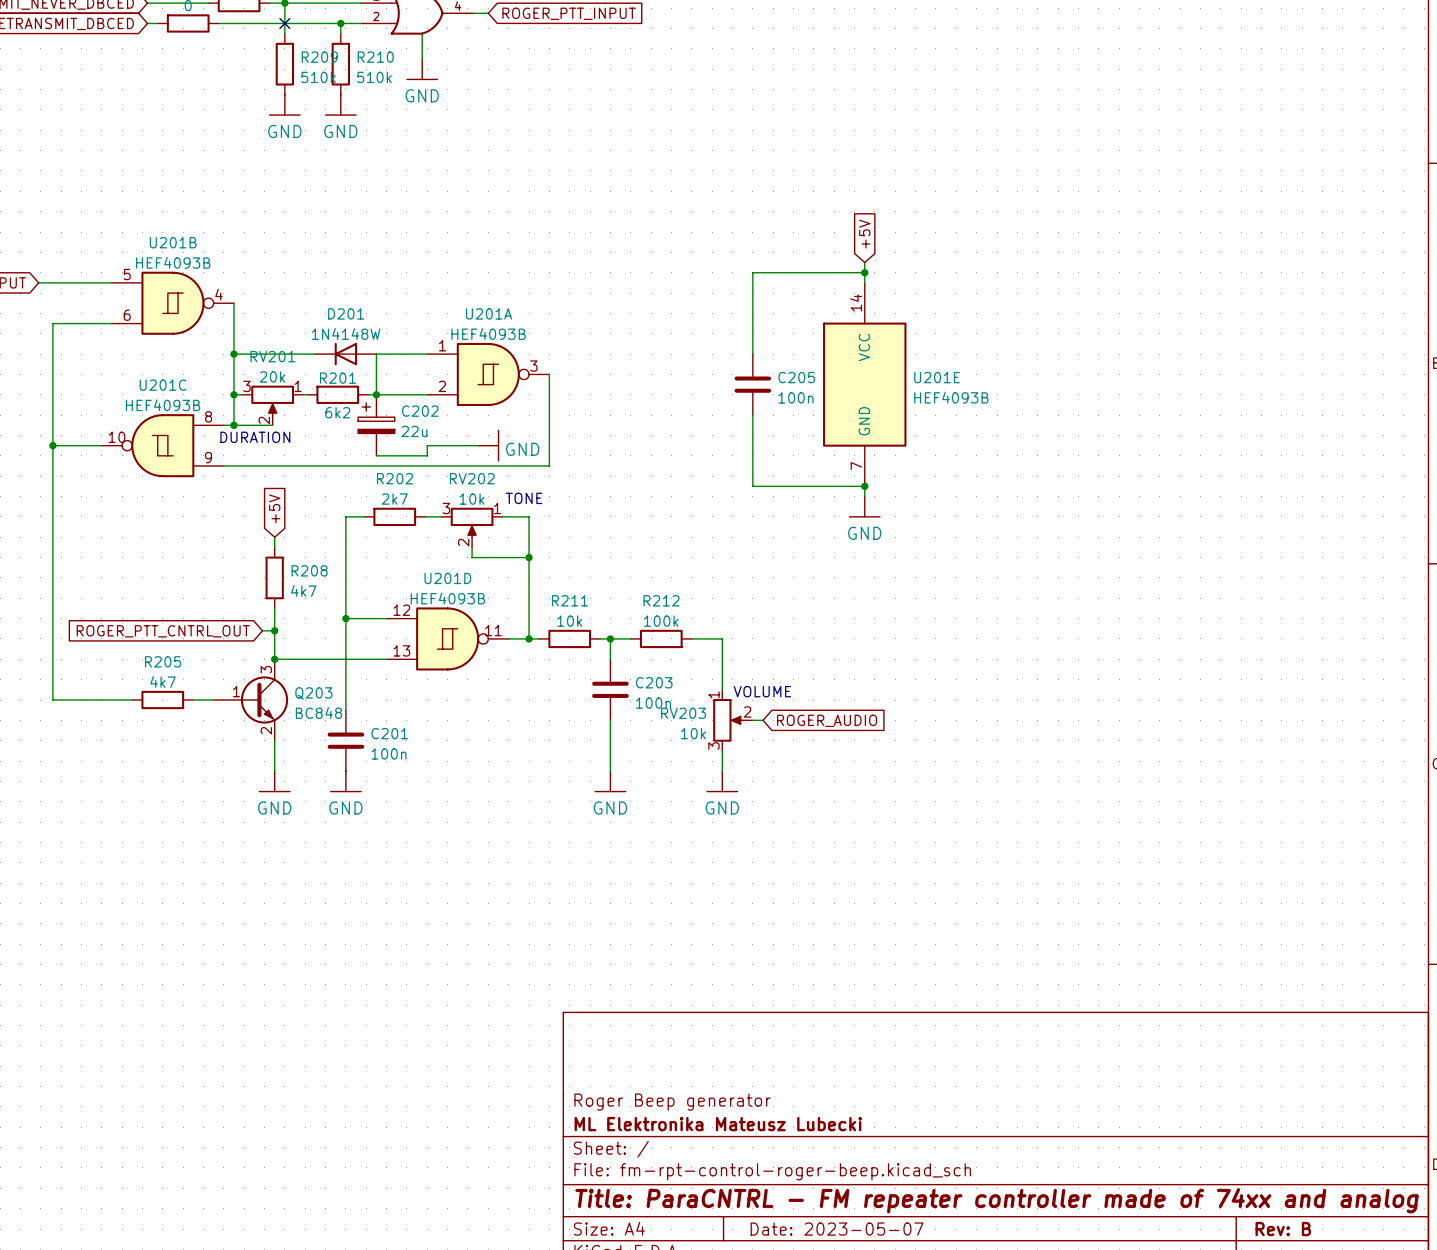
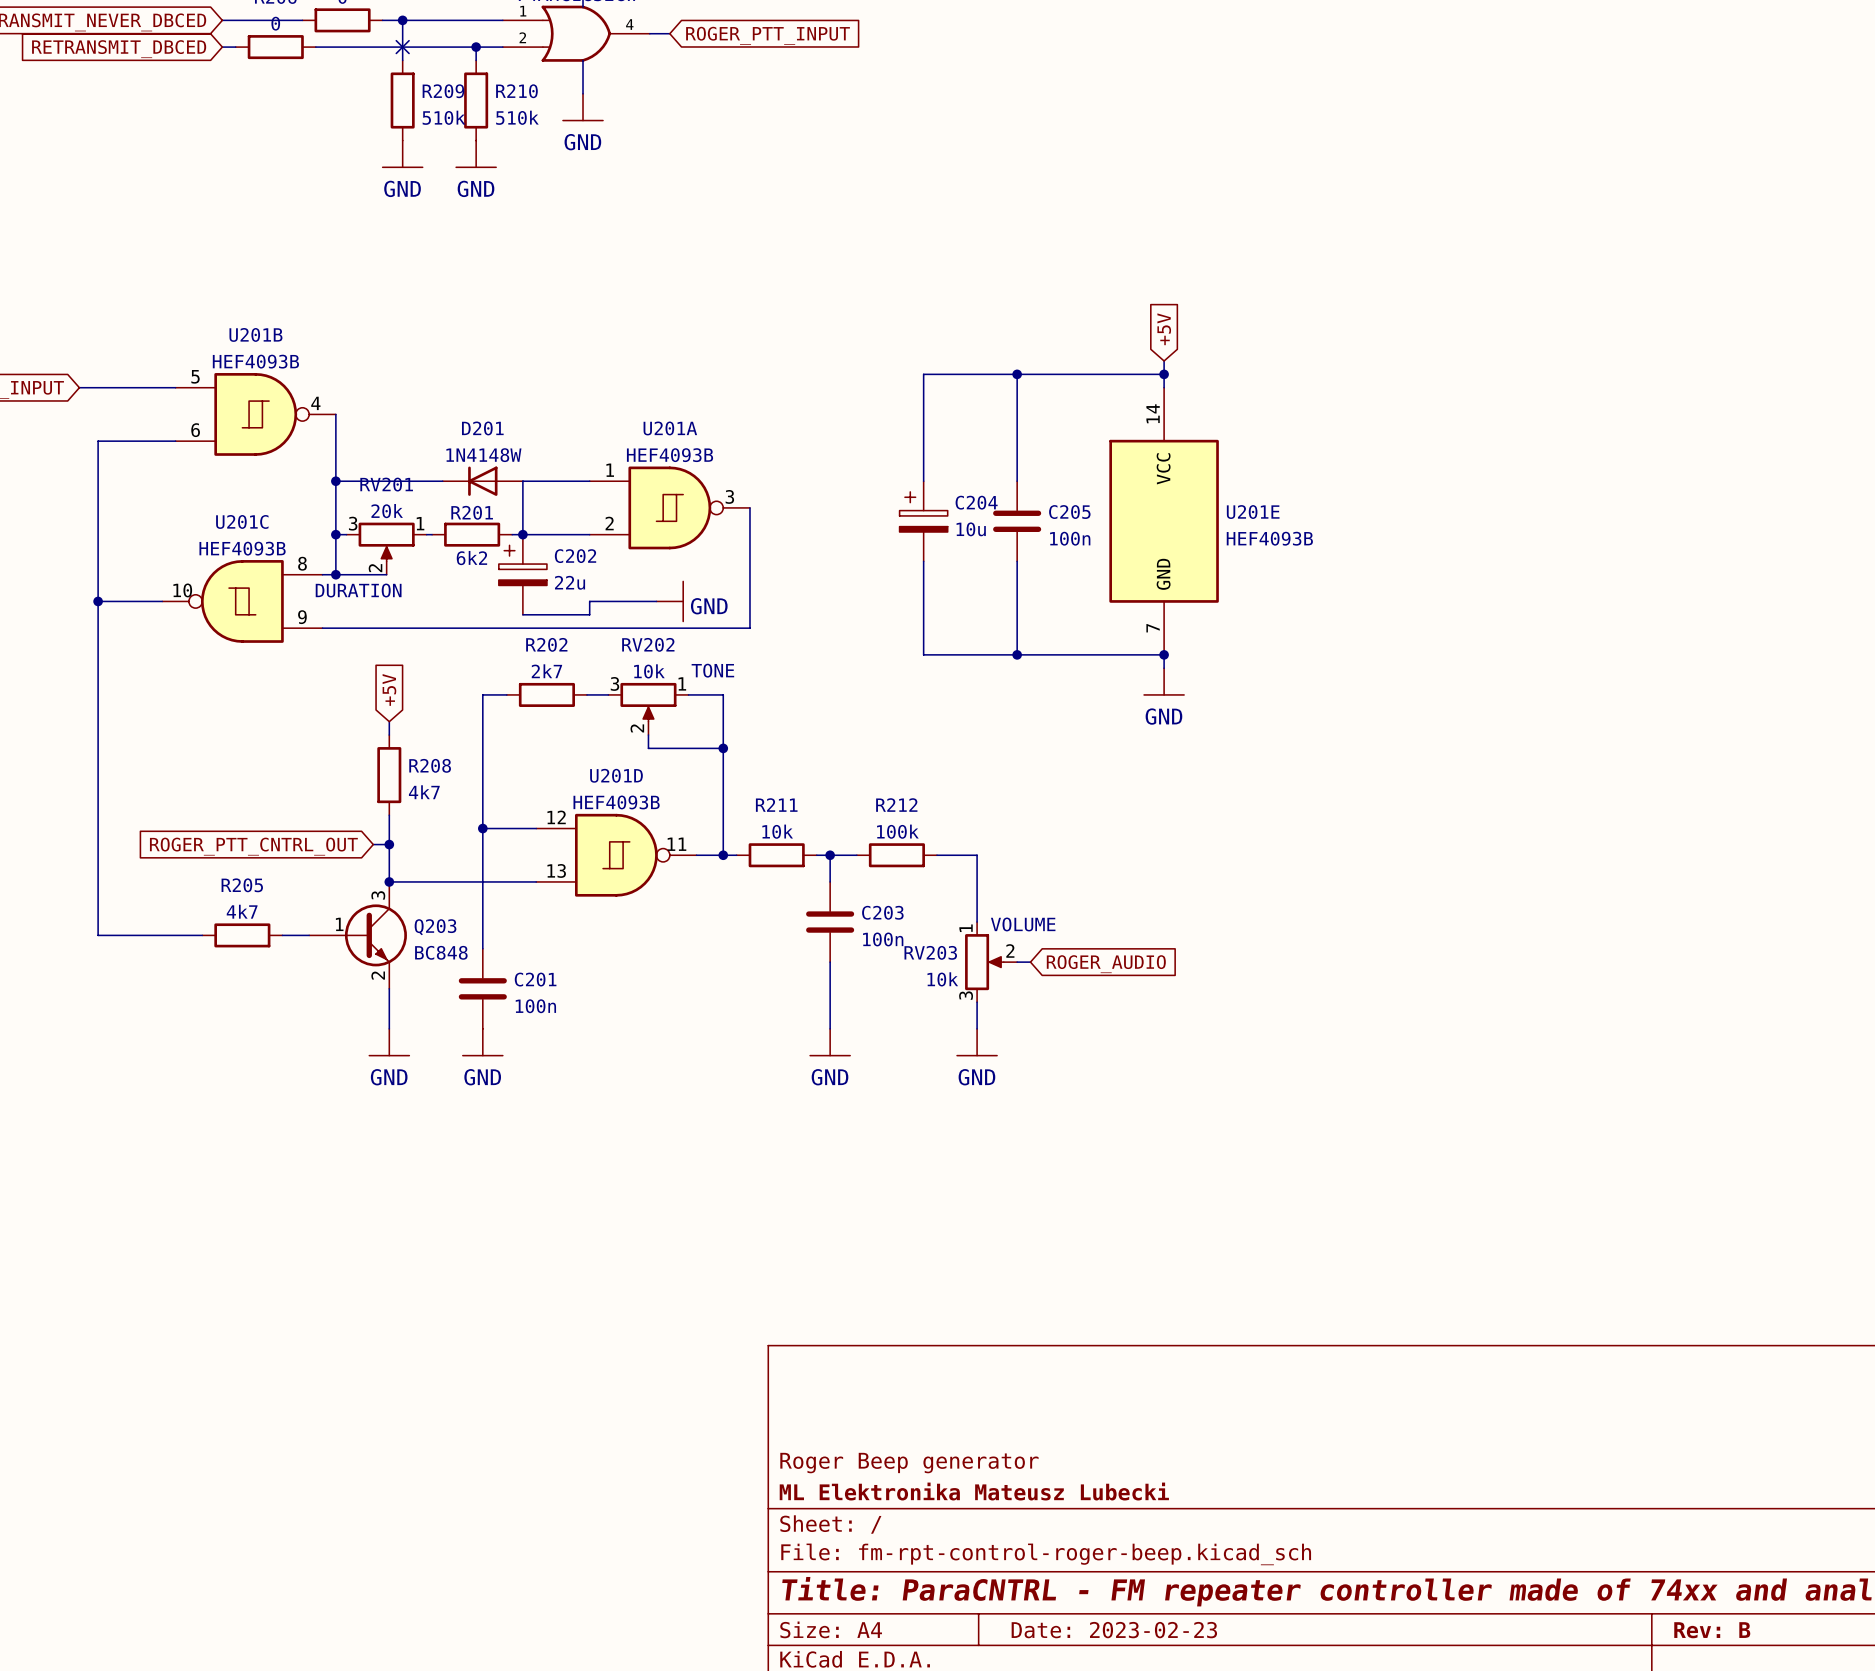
wire: none -> (1017, 374) (923, 374) (923, 481)
junction: none -> (1017, 374)
C204: none -> 10u (923, 521)
wire: none -> (923, 561) (923, 654) (1017, 654)
junction: none -> (1017, 654)
title block: Date: 2023-05-07 (837, 1229) -> Date: 2023-02-23 (1114, 1630)

